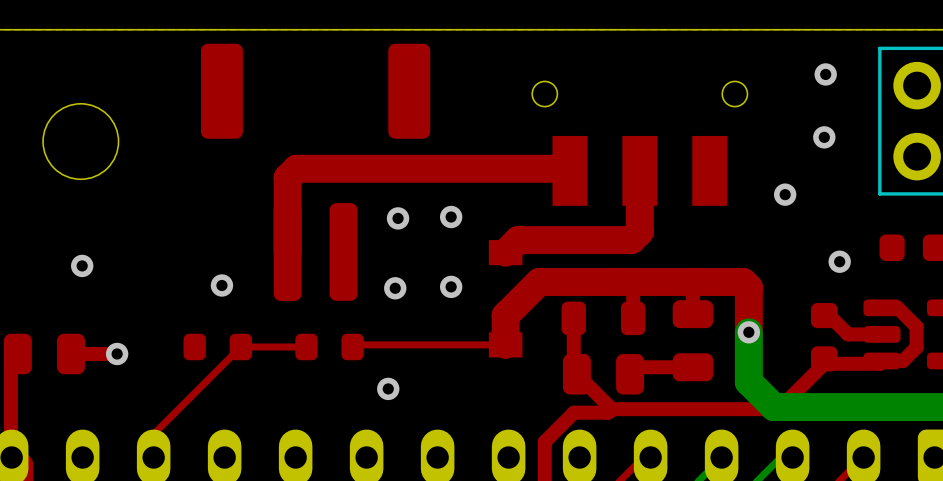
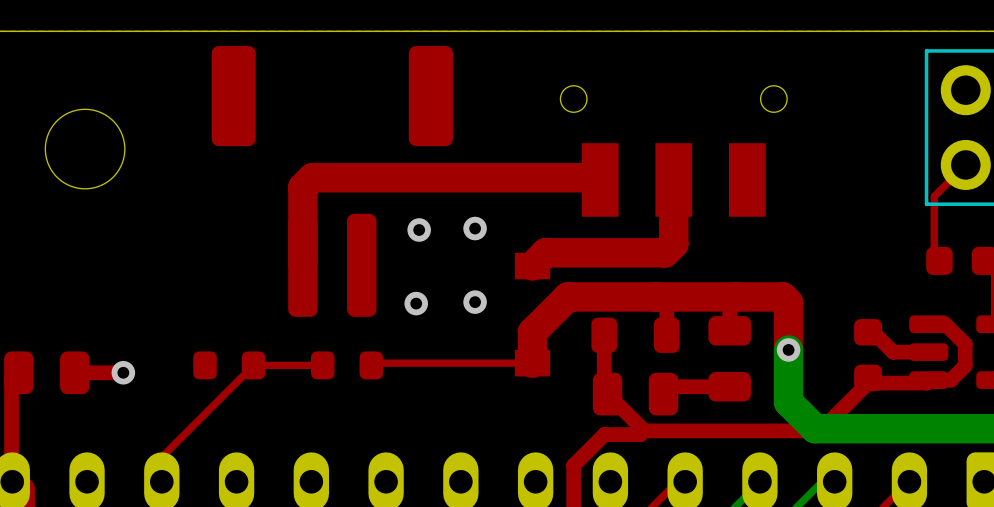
via: (825, 74) -> none
via: (824, 137) -> none
top track: none -> (965, 164) (934, 196) (934, 260)
via: (785, 194) -> none
via: (839, 261) -> none
via: (82, 265) -> none
via: (221, 285) -> none
via: (388, 388) -> none

